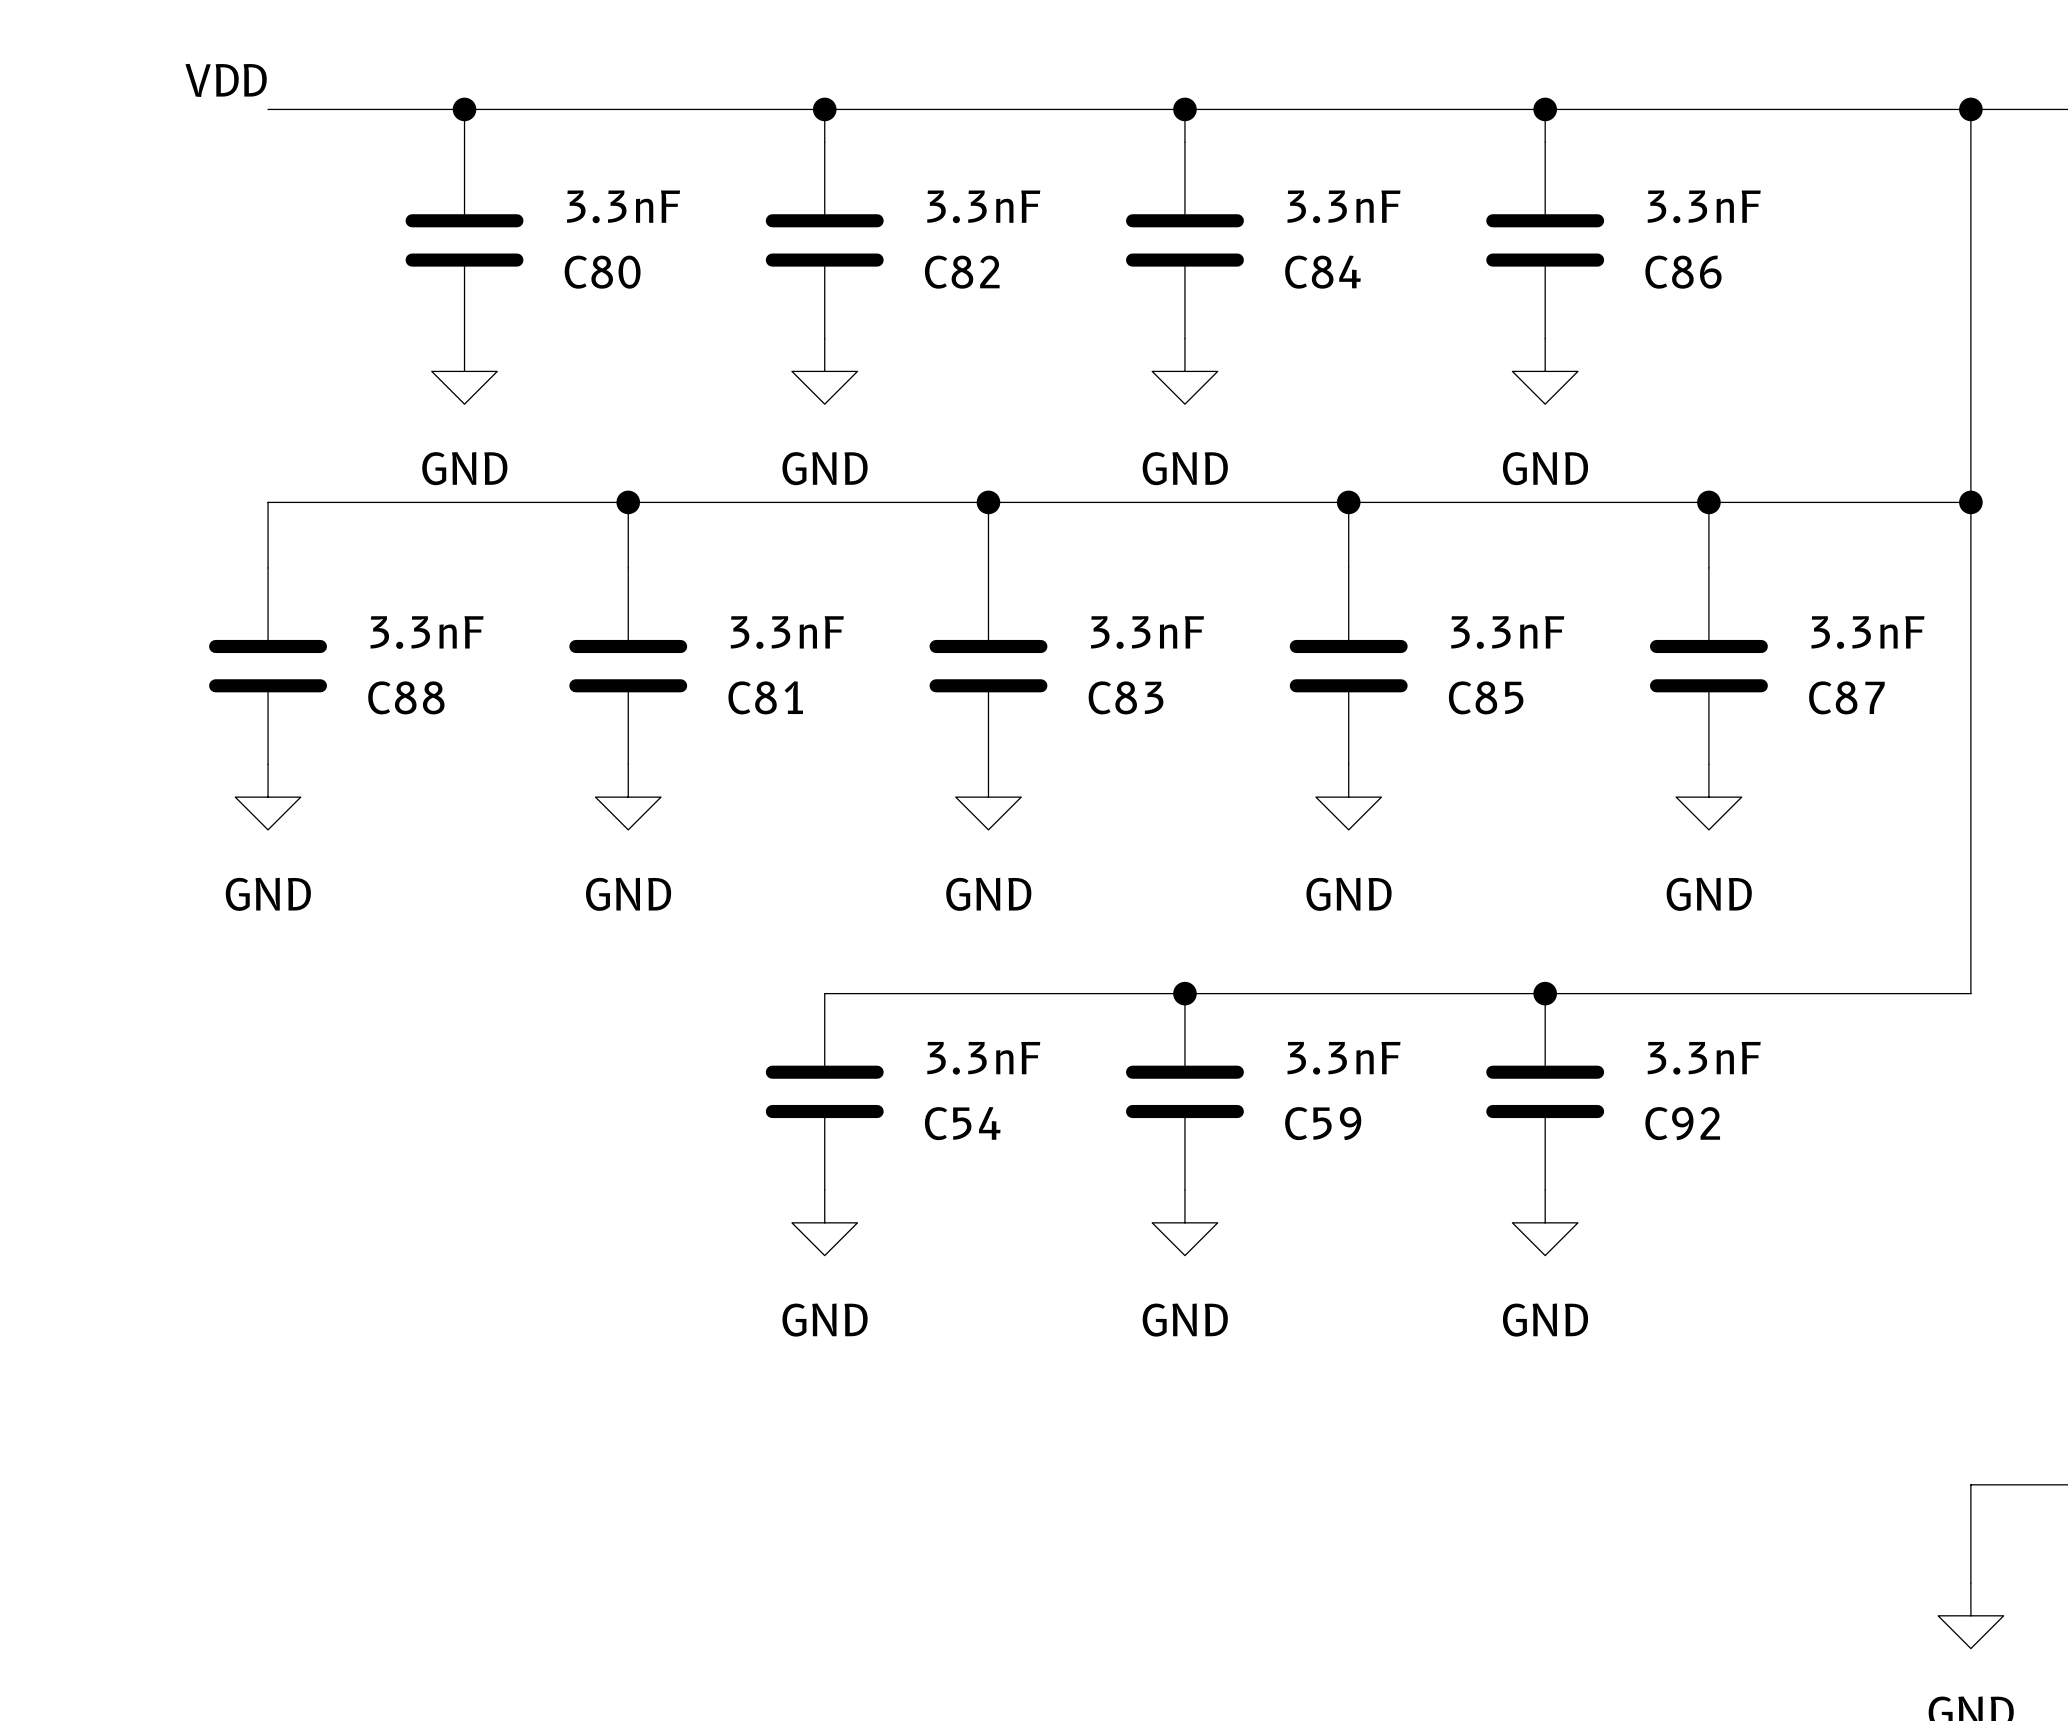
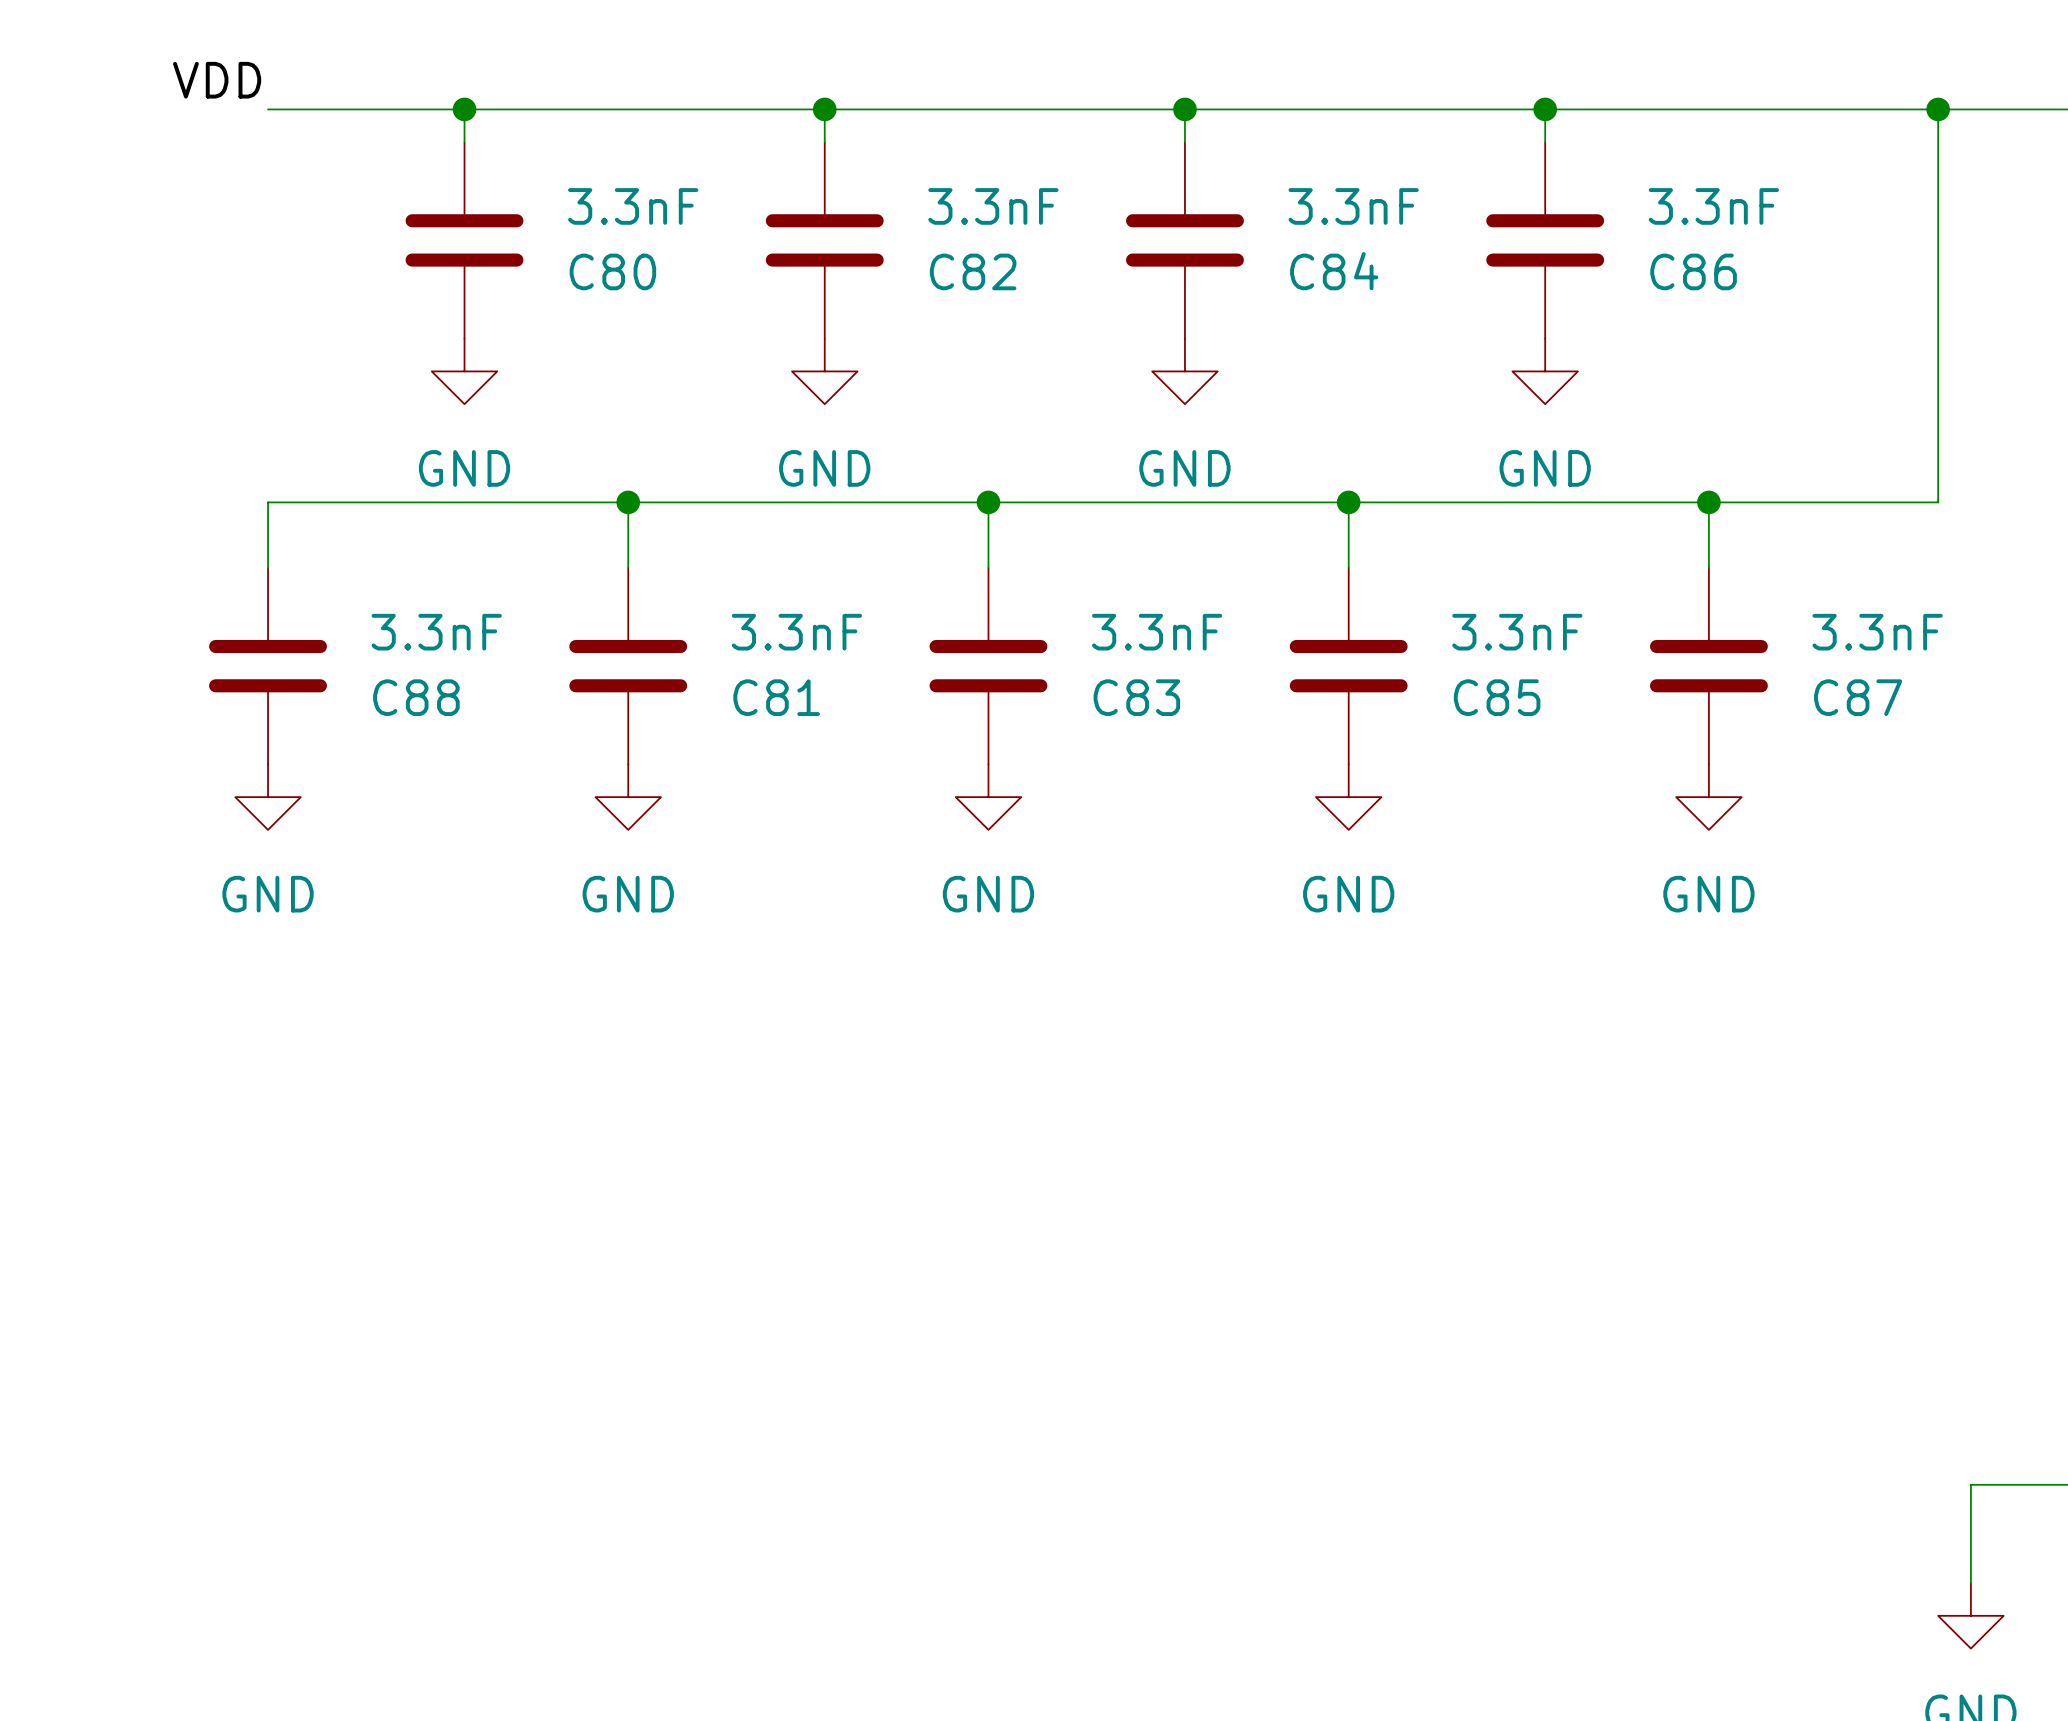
wire: (1970, 109) (1970, 993) (824, 993) -> none
junction position: (1970, 109) -> (1938, 109)
wire: (1938, 502) (1970, 502) -> (1938, 502) (1938, 109)
junction: (1970, 502) -> none
junction: (1184, 993) -> none
junction: (1545, 993) -> none
C54: 3.3nF (824, 1091) -> none
C59: 3.3nF (1184, 1091) -> none
C92: 3.3nF (1545, 1091) -> none
power symbol: GND (824, 1222) -> none
power symbol: GND (1184, 1222) -> none
power symbol: GND (1545, 1222) -> none

